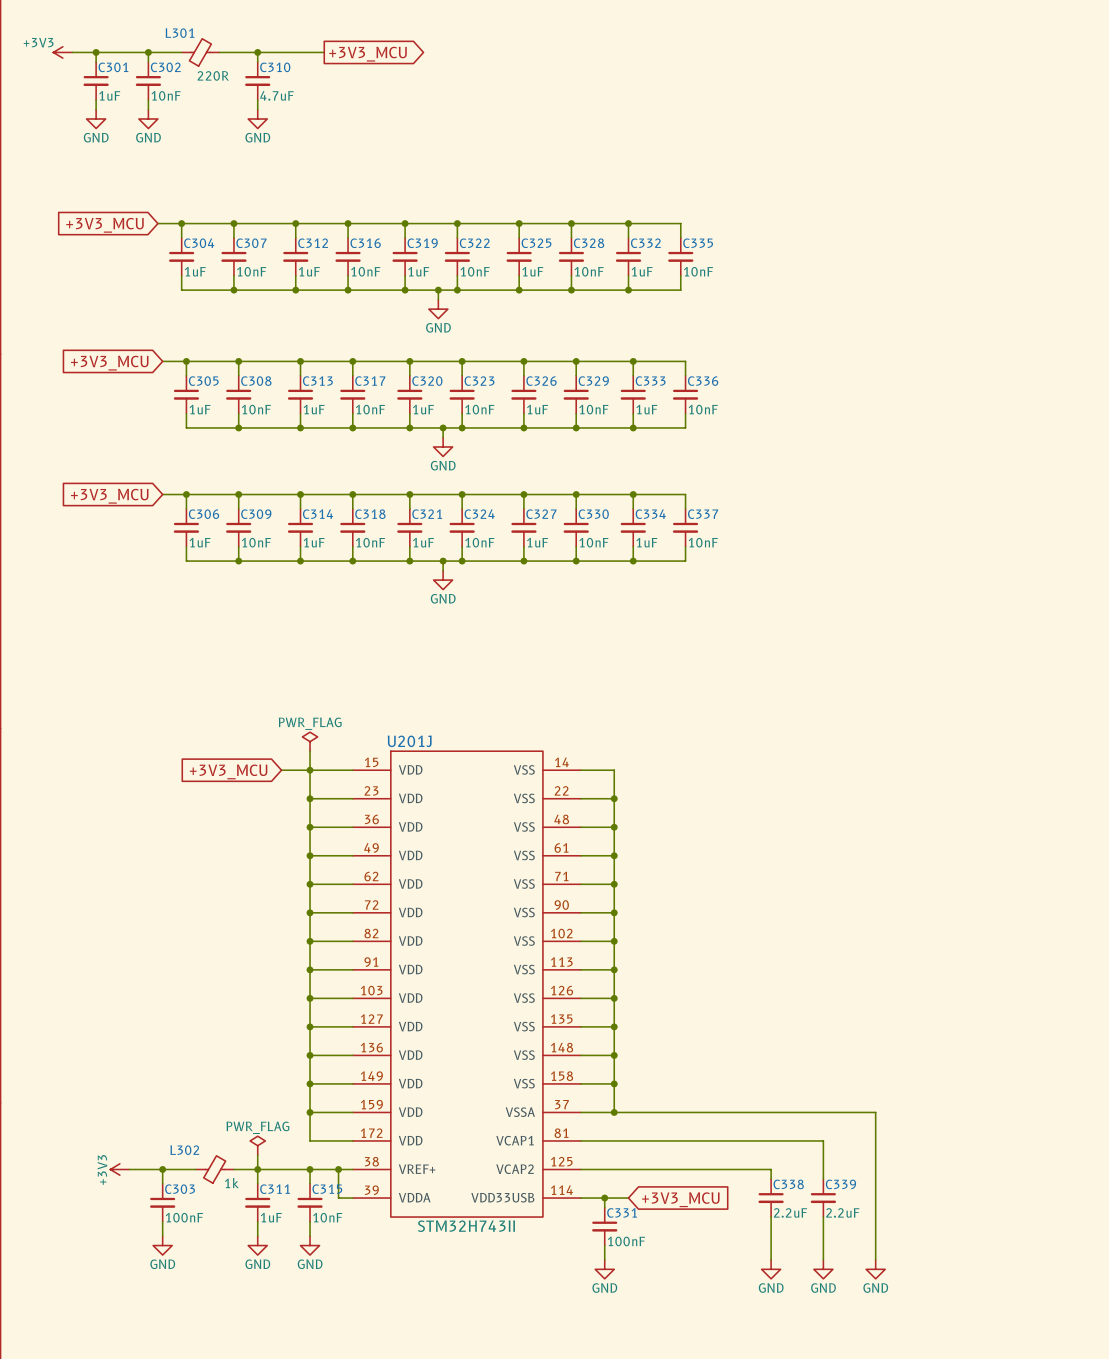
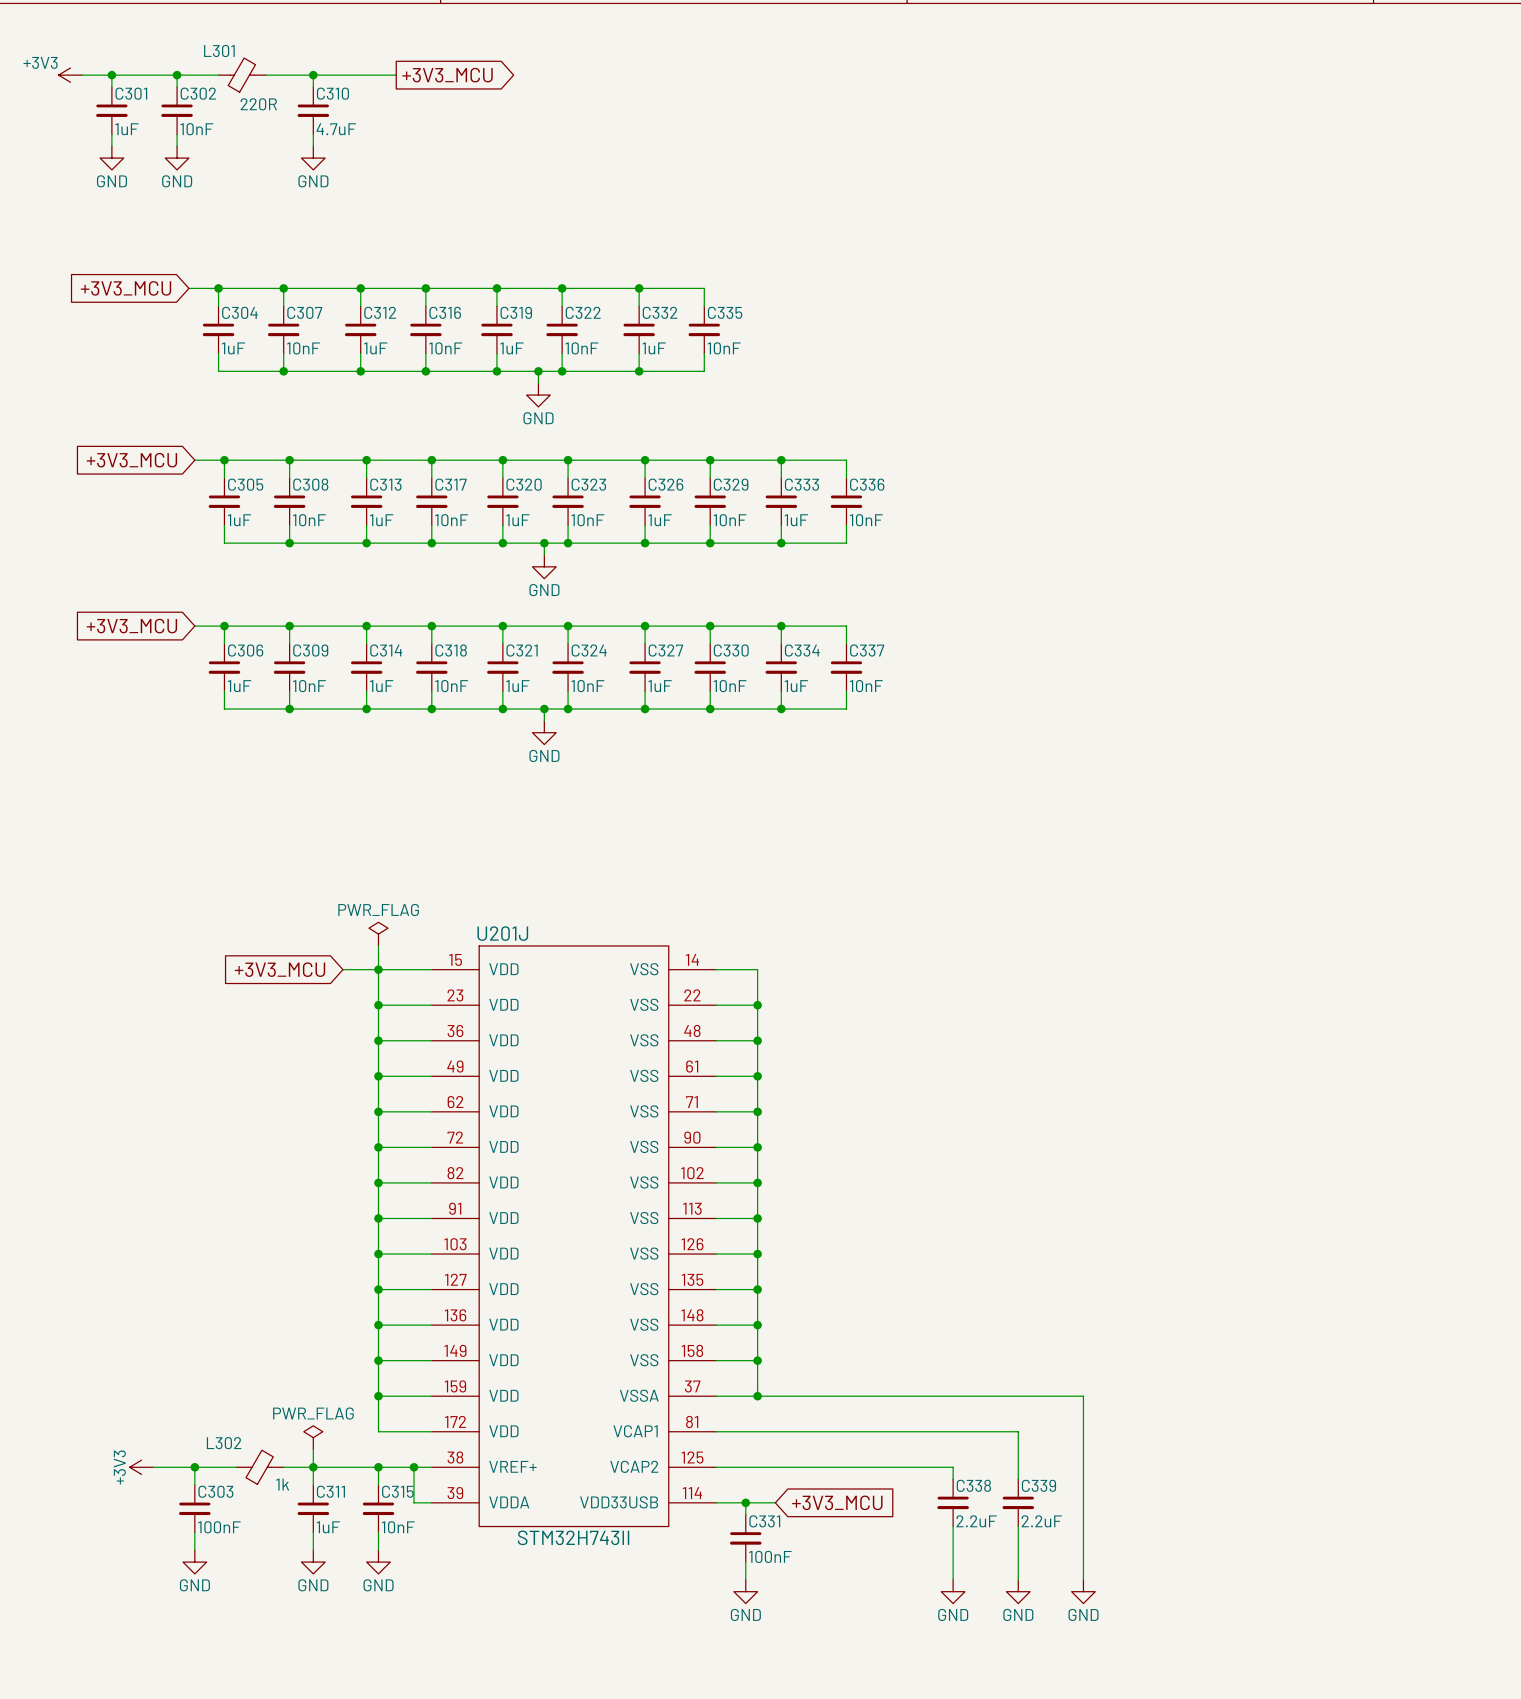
wire: (571, 223) (680, 223) (680, 237) -> none
junction: (571, 223) -> none
wire: (628, 223) (628, 237) -> none
junction: (628, 223) -> none
C325 name: C325 (536, 243) -> C332 (660, 312)
C328 name: C328 (589, 243) -> C335 (725, 312)
C332: 1uF (628, 256) -> none
C335: 10nF (680, 256) -> none
wire: (628, 275) (628, 290) -> none
wire: (680, 275) (680, 290) (571, 290) -> none
junction: (571, 290) -> none
junction: (628, 290) -> none

